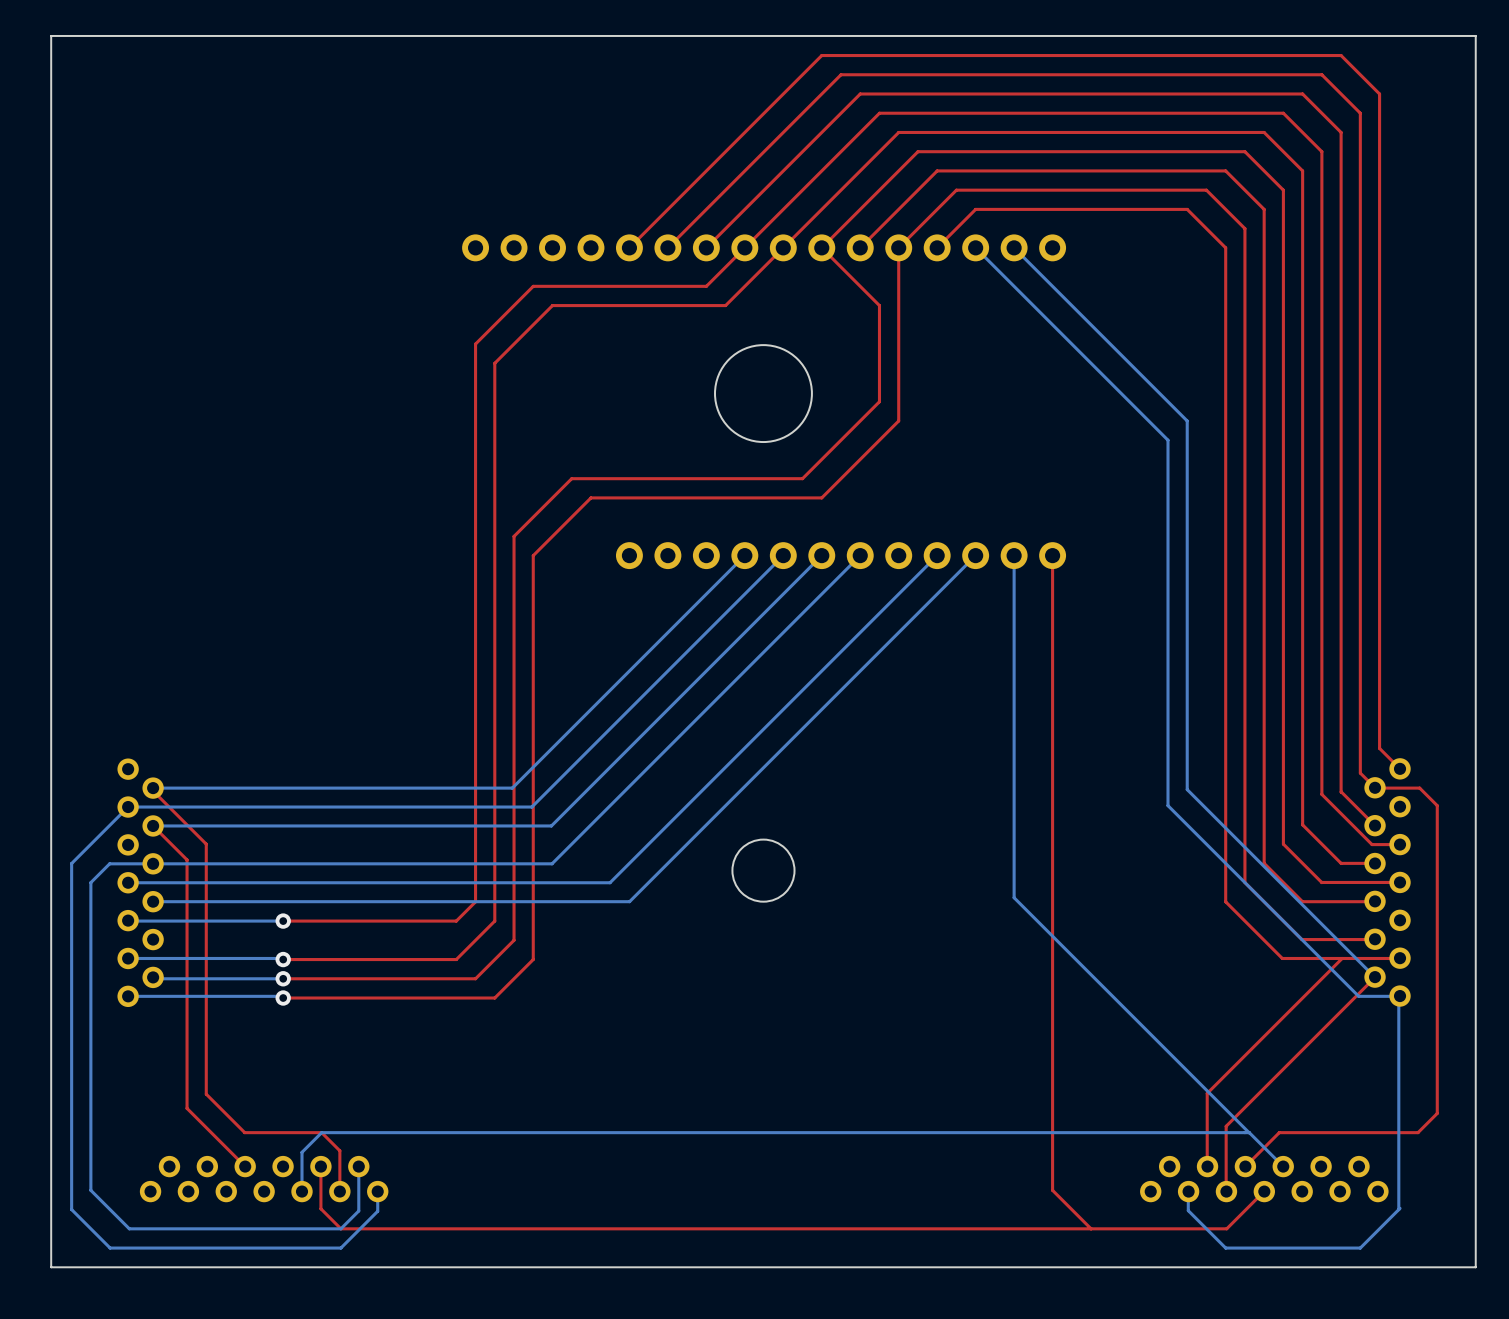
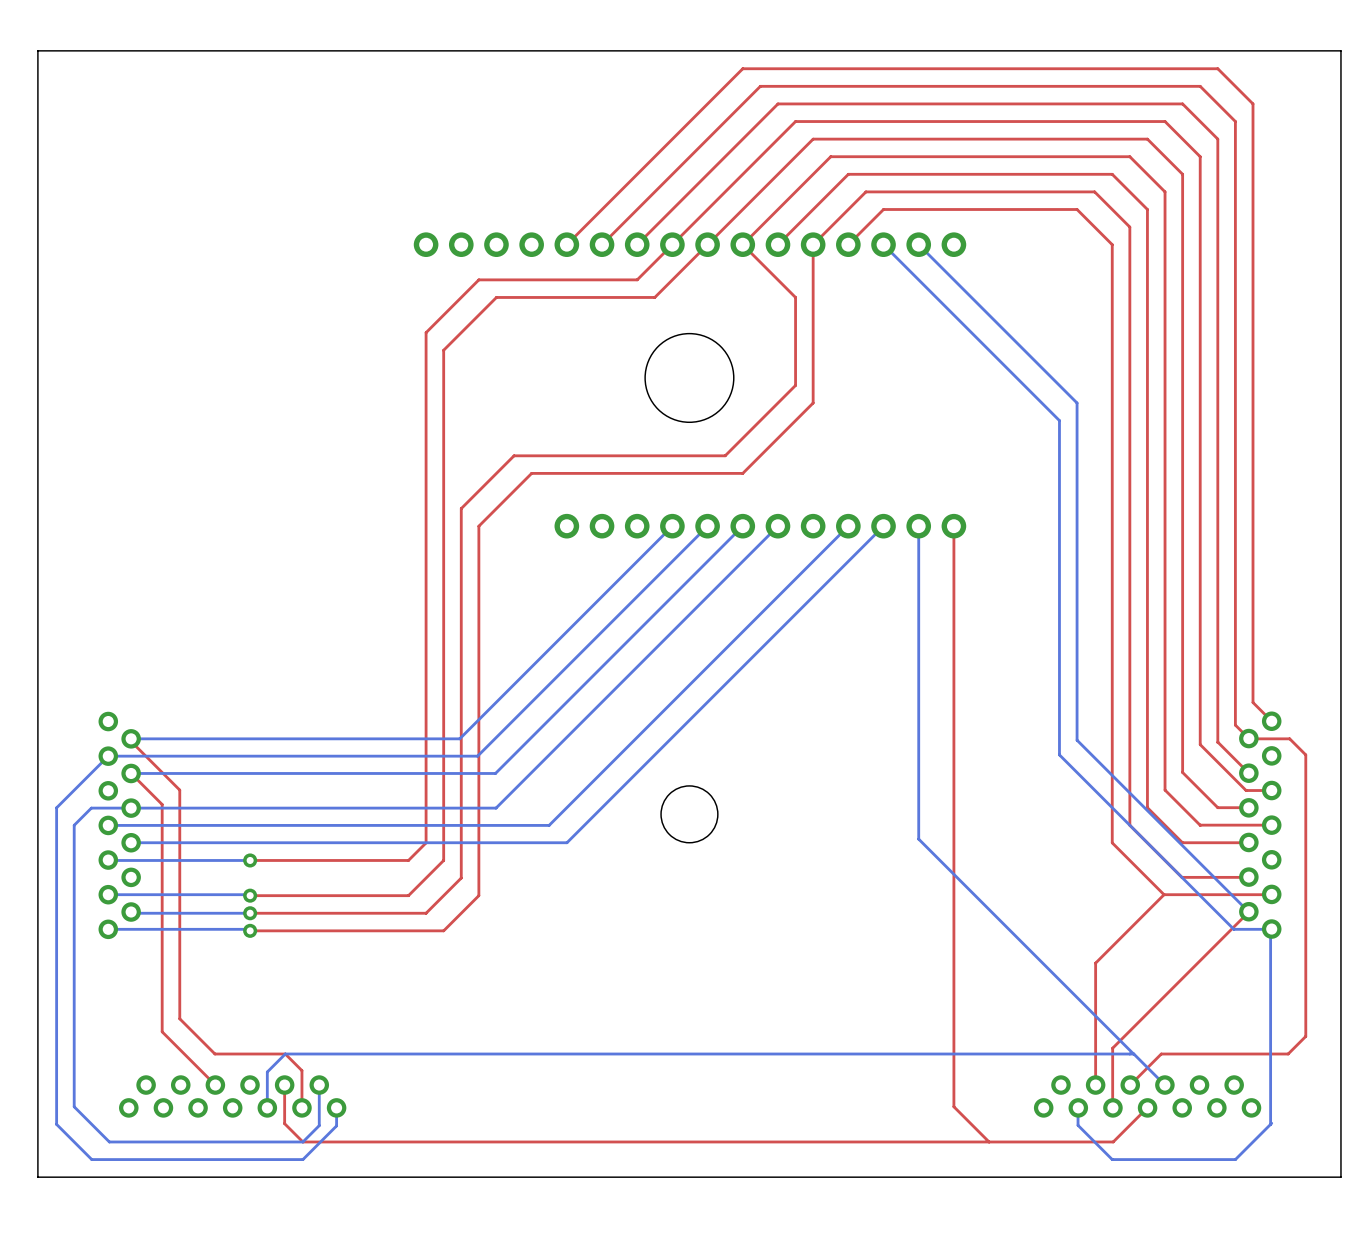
top track: (1342, 958) (1207, 1093) (1207, 1166) -> (1164, 894) (1095, 963) (1095, 1085)

